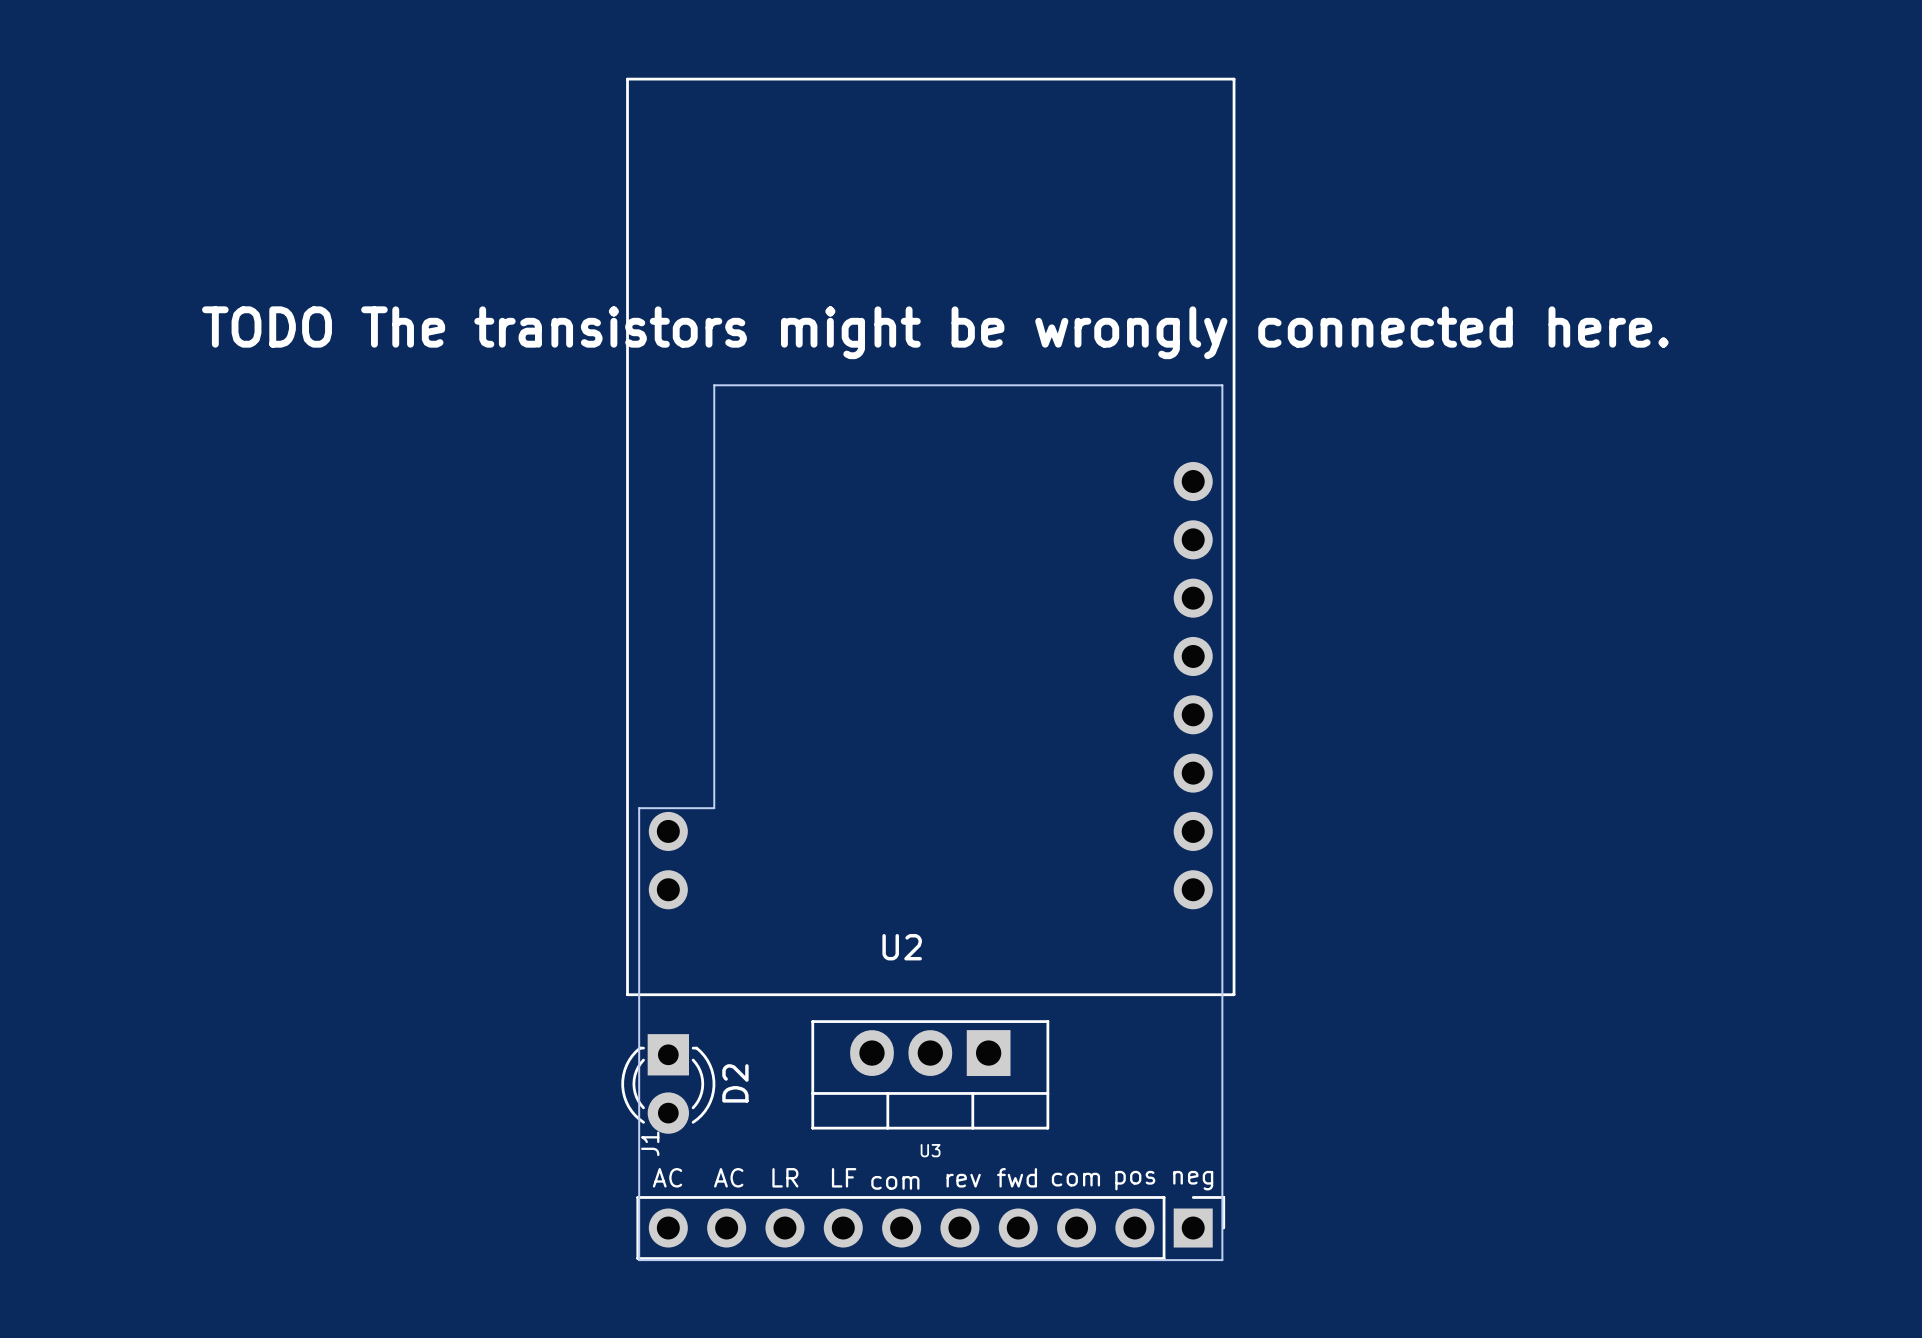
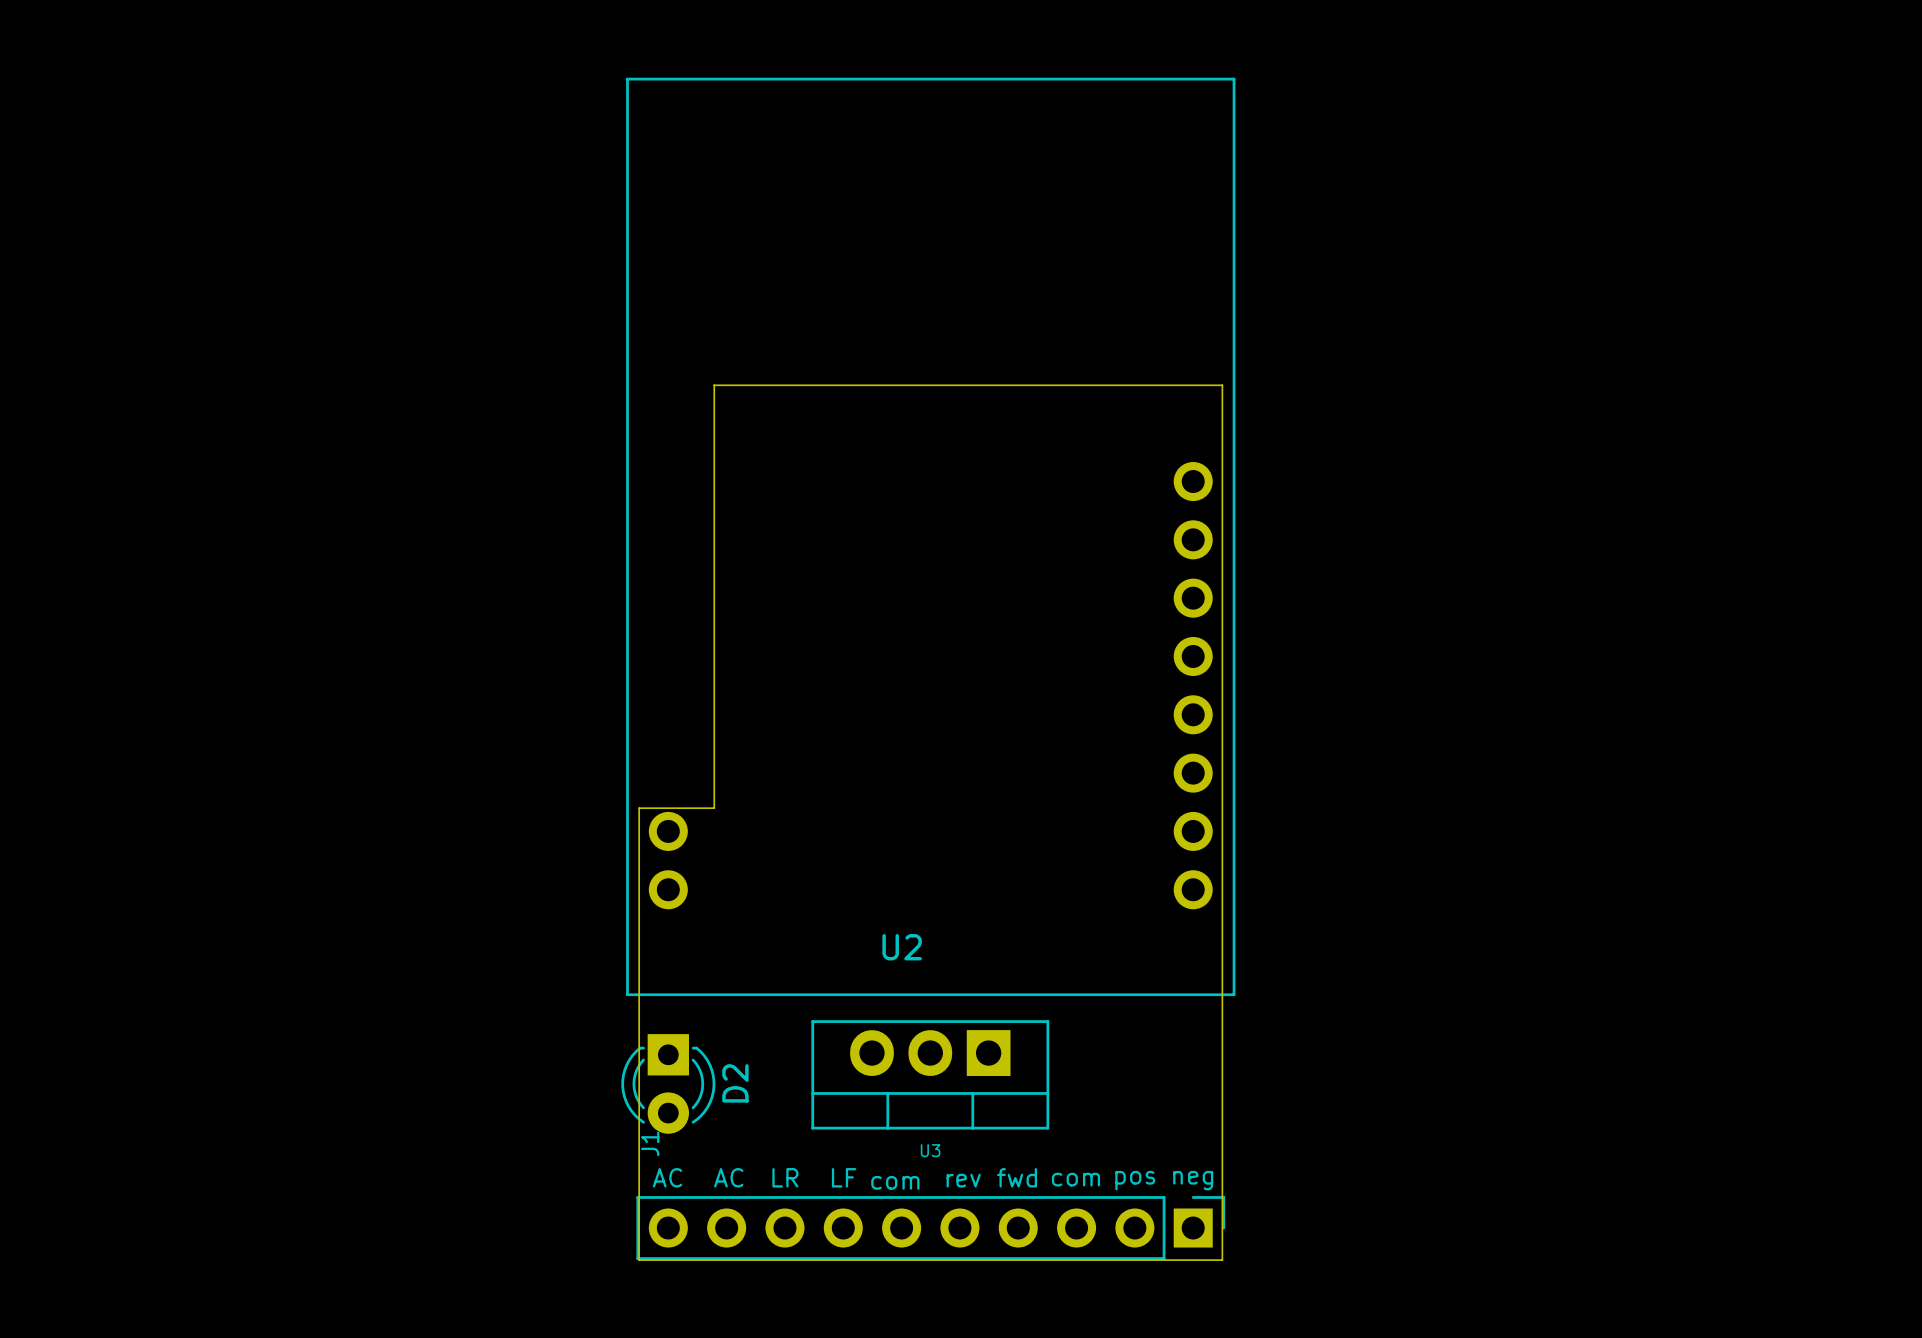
text: TODO The transistors might be wrongly connected here. (935, 332) -> none

